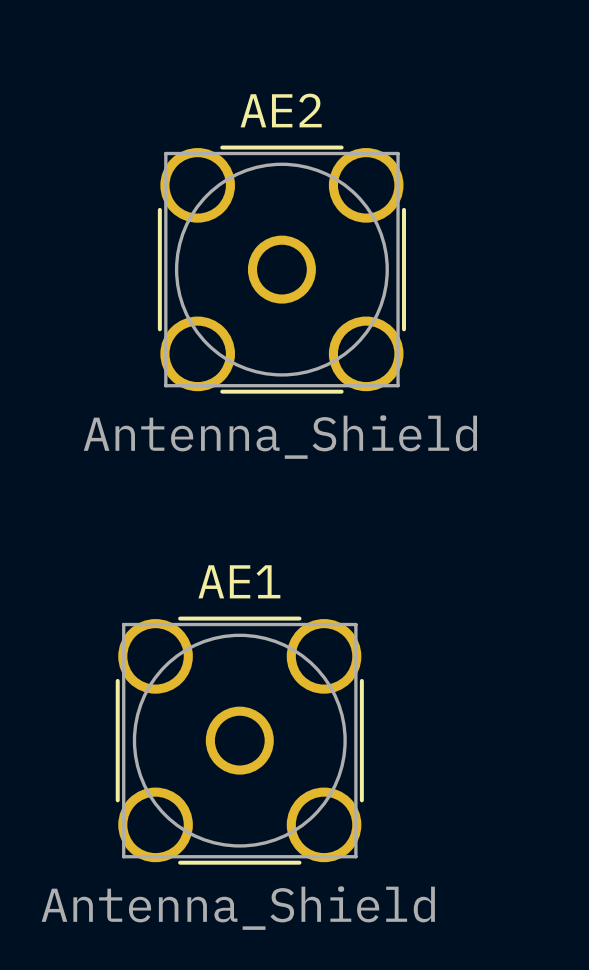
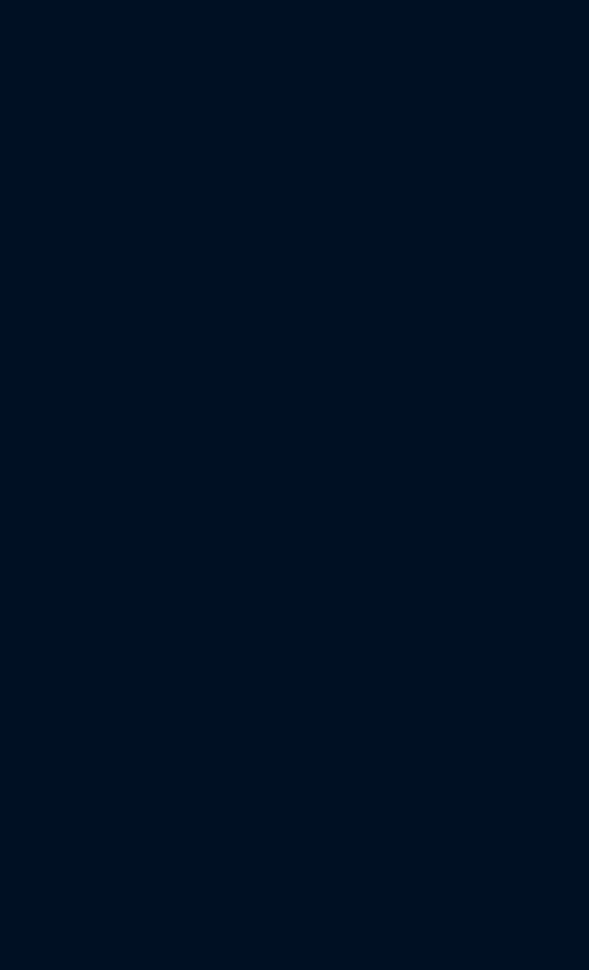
AE2: Antenna_Shield (281, 269) -> none
AE1: Antenna_Shield (239, 740) -> none

